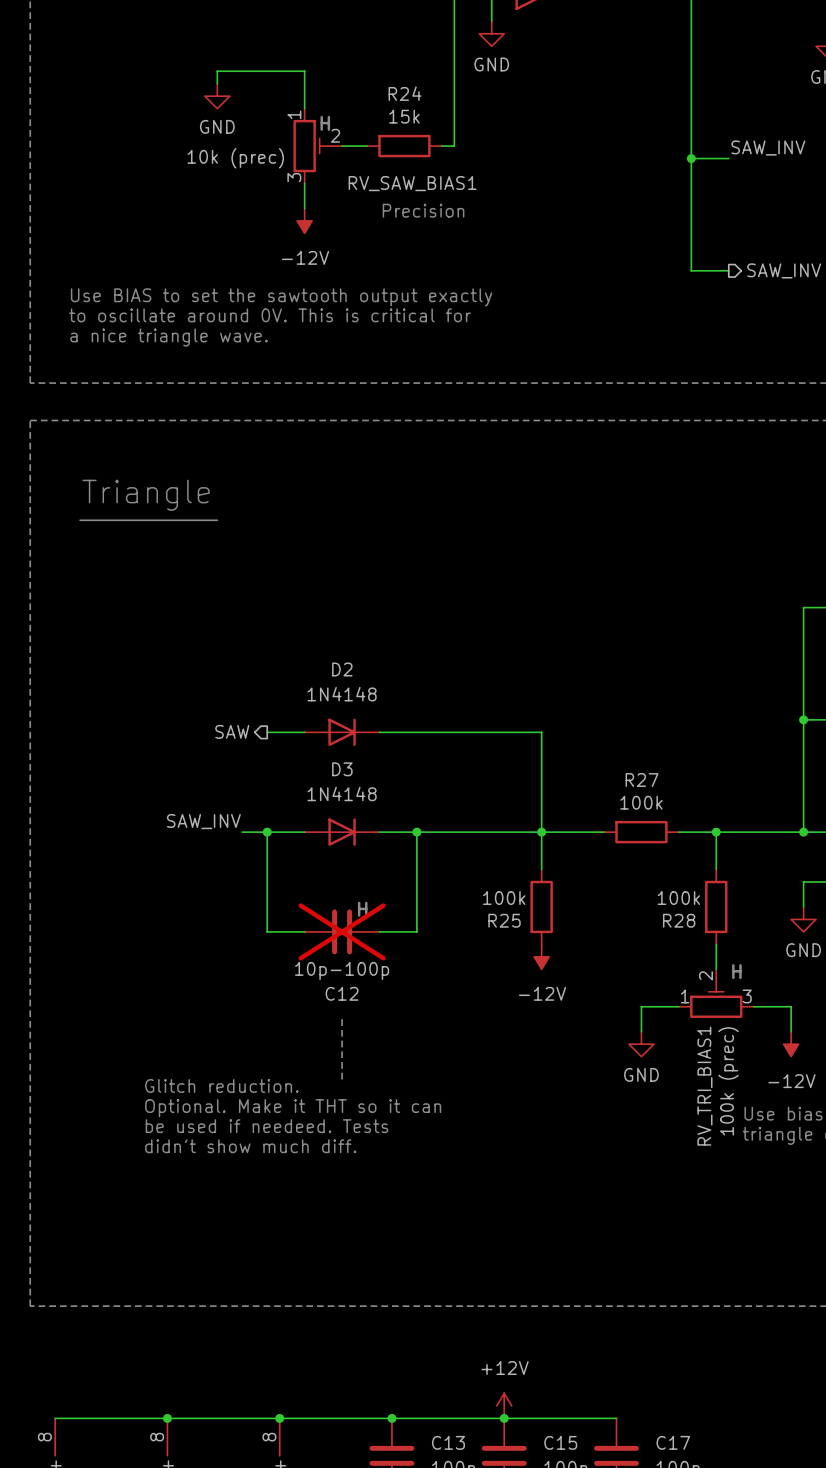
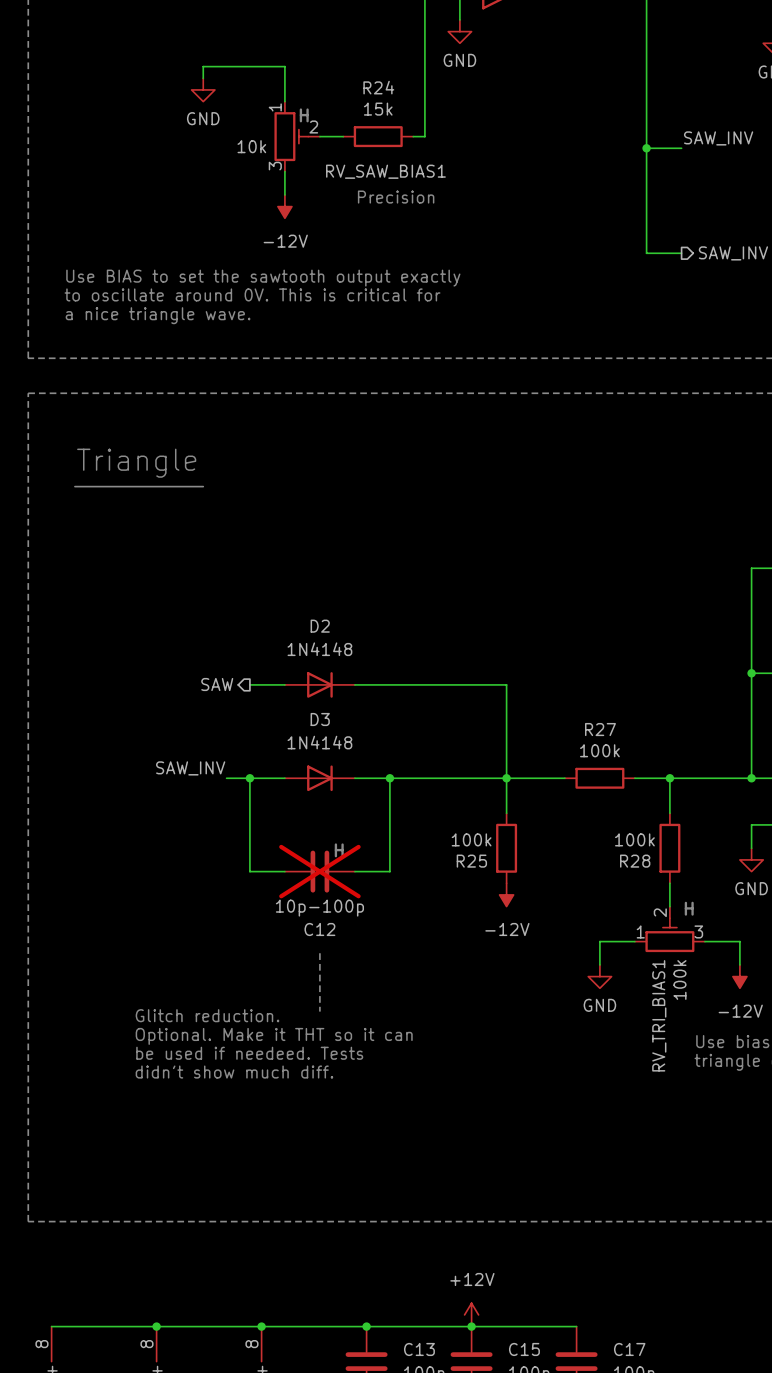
RV_SAW_BIAS1 value: 10k (prec) (235, 158) -> 10k (251, 146)
RV_TRI_BIAS1 value: 100k (prec) (728, 1081) -> 100k (679, 980)

